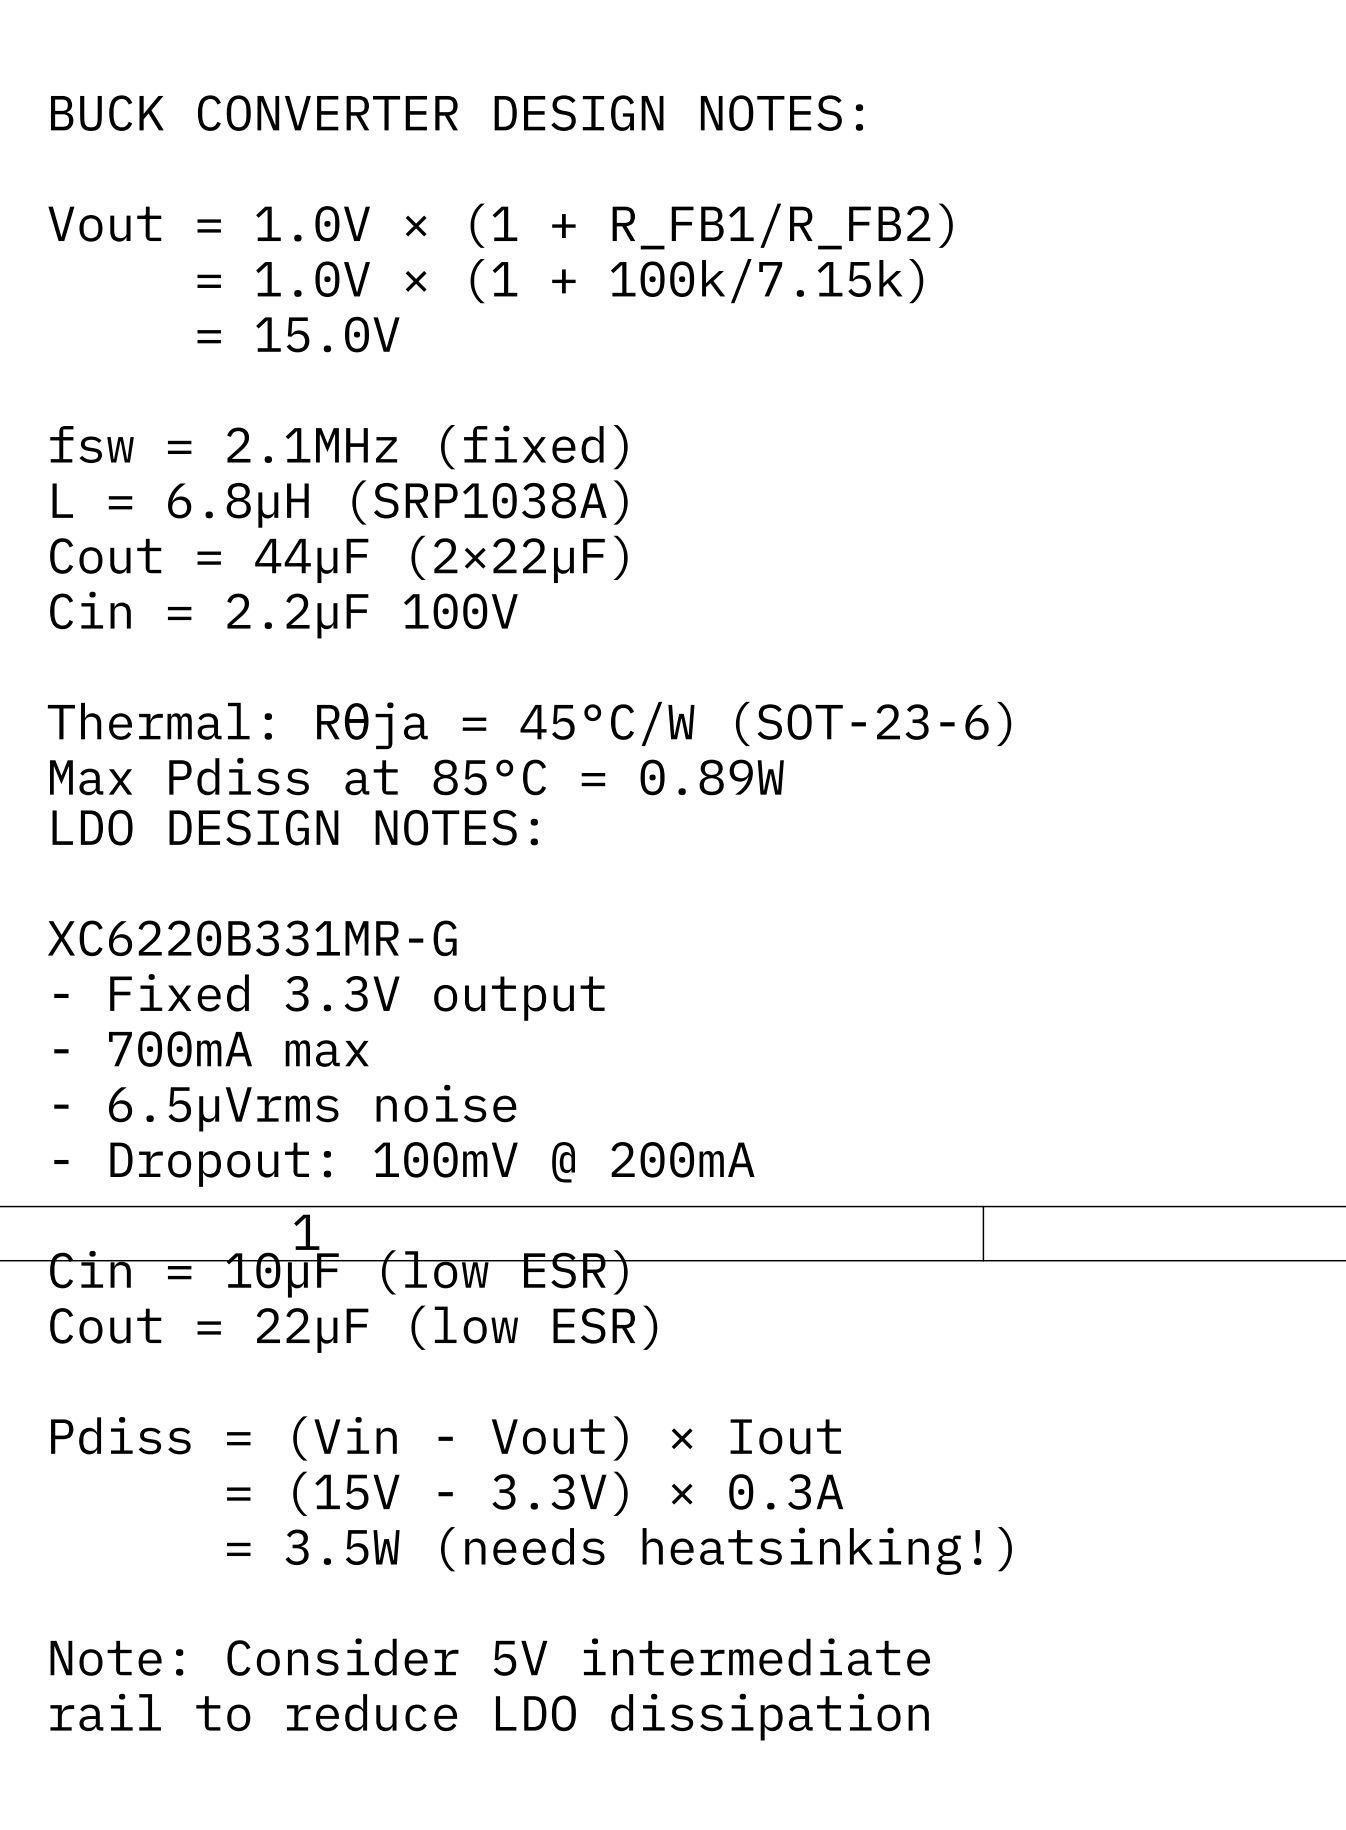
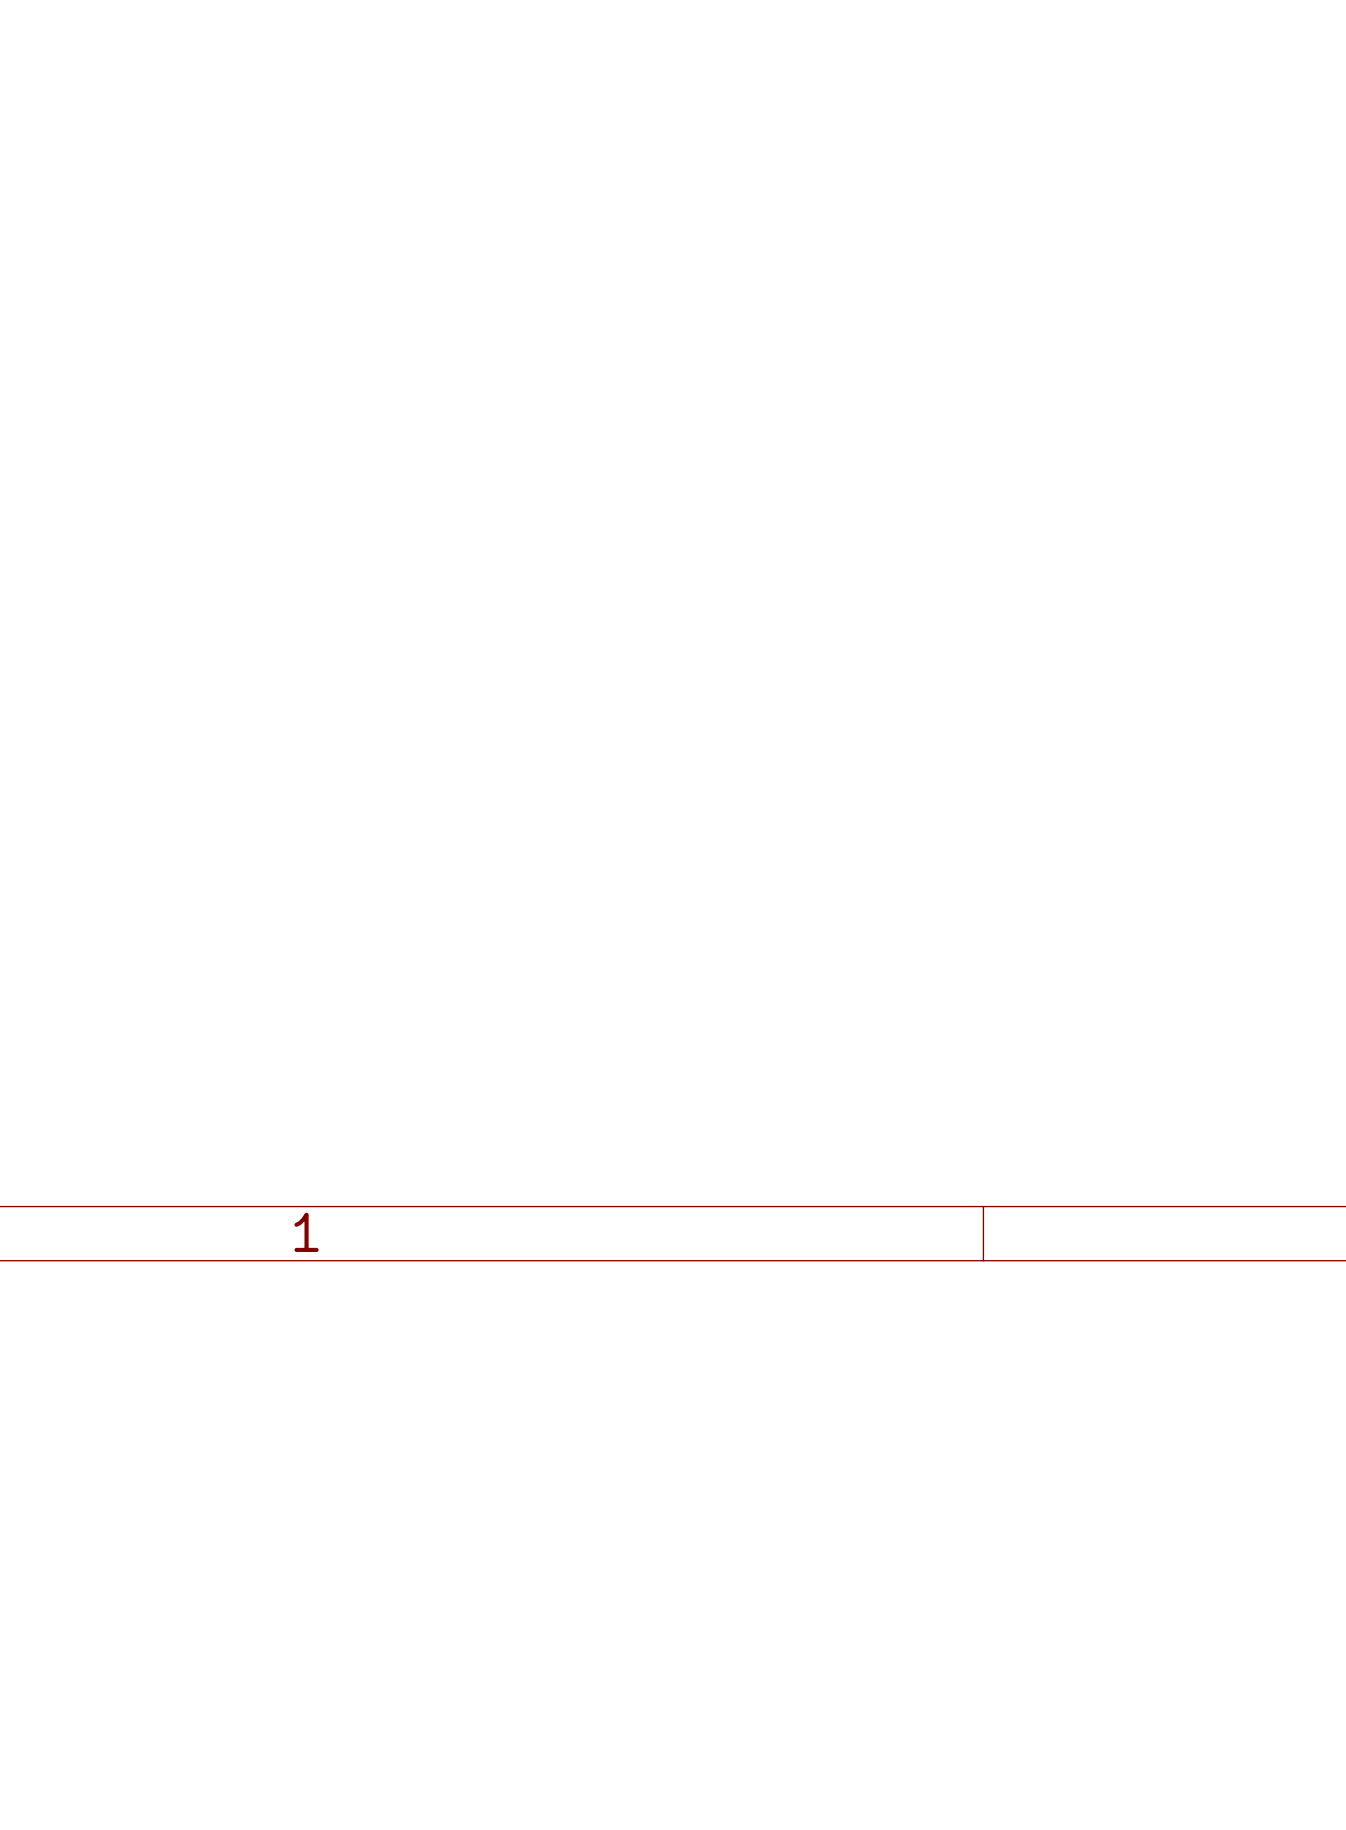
text: BUCK CONVERTER DESIGN NOTES: (457, 113) -> none
text: Vout = 1.0V × (1 + R_FB1/R_FB2) (500, 226) -> none
text: = 1.0V × (1 + 100k/7.15k) (560, 281) -> none
text: = 15.0V (298, 334) -> none
text: fsw = 2.1MHz (fixed) (338, 447) -> none
text: L = 6.8µH (SRP1038A) (340, 504) -> none
text: Cout = 44µF (2×22µF) (338, 559) -> none
text: Cin = 2.2µF 100V (283, 615) -> none
text: Thermal: Rθja = 45°C/W (SOT-23-6) (529, 725) -> none
text: Max Pdiss at 85°C = 0.89W (416, 776) -> none
text: LDO DESIGN NOTES: (295, 827) -> none
text: XC6220B331MR-G (252, 938) -> none
text: - Fixed 3.3V output (329, 997) -> none
text: - 700mA max (211, 1049) -> none
text: - 6.5µVrms noise (285, 1108) -> none
text: - Dropout: 100mV @ 200mA (404, 1164) -> none
text: Cin = 10µF (low ESR) (338, 1273) -> none
text: Cout = 22µF (low ESR) (353, 1329) -> none
text: Pdiss = (Vin - Vout) × Iout (446, 1438) -> none
text: = (15V - 3.3V) × 0.3A (535, 1493) -> none
text: = 3.5W (needs heatsinking!) (619, 1551) -> none
text: Note: Consider 5V intermediate (490, 1657) -> none
text: rail to reduce LDO dissipation (489, 1717) -> none

